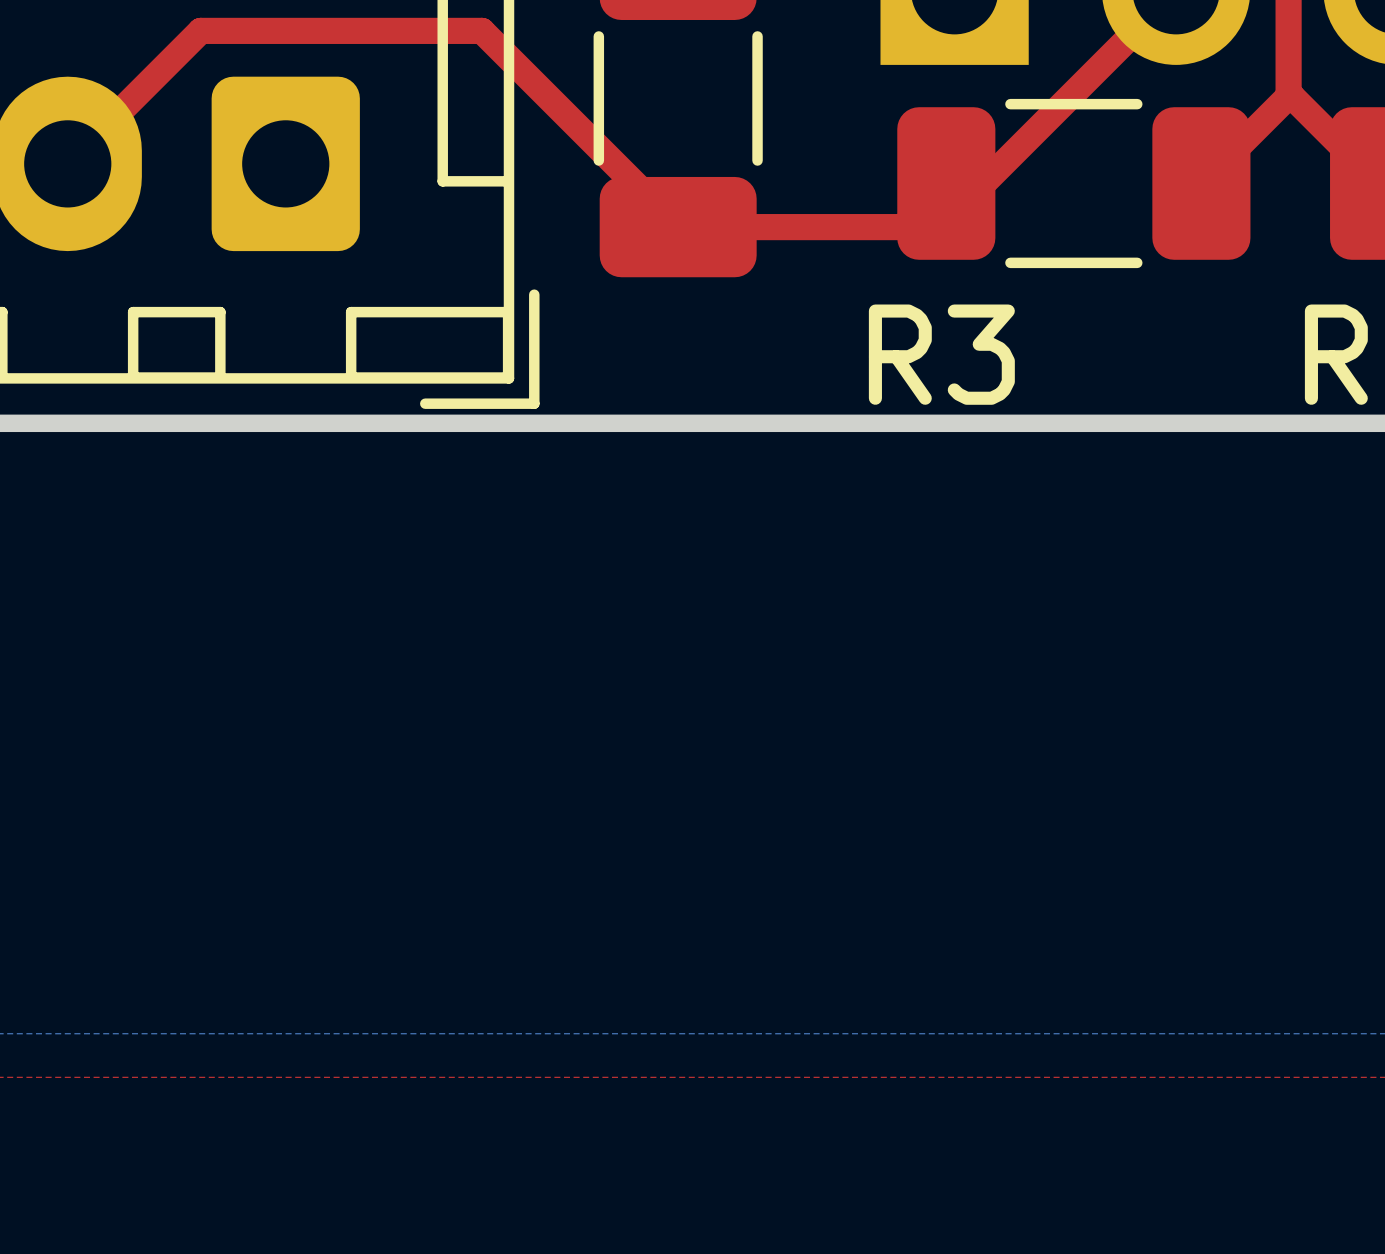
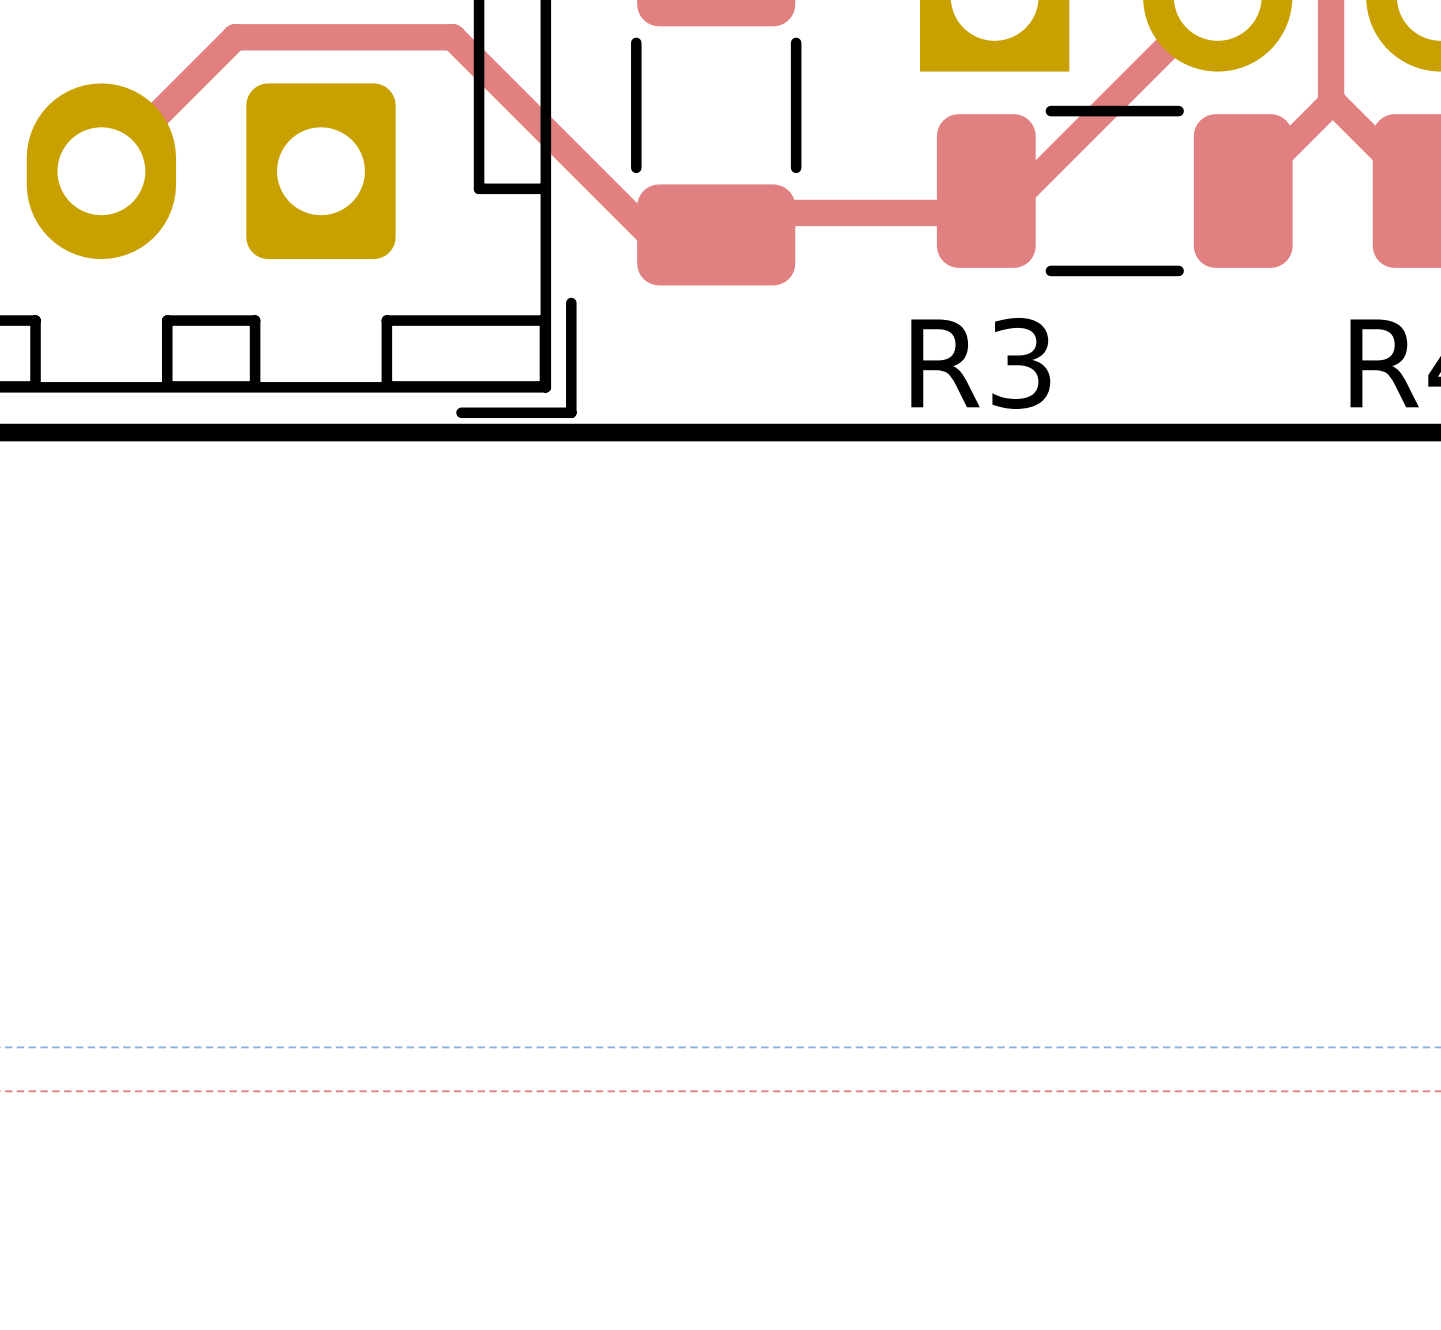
top track: (416, 30) (481, 30) (678, 227) (902, 227) (924, 205) -> (452, 37) (650, 234) (716, 234) (738, 212) (964, 212)

